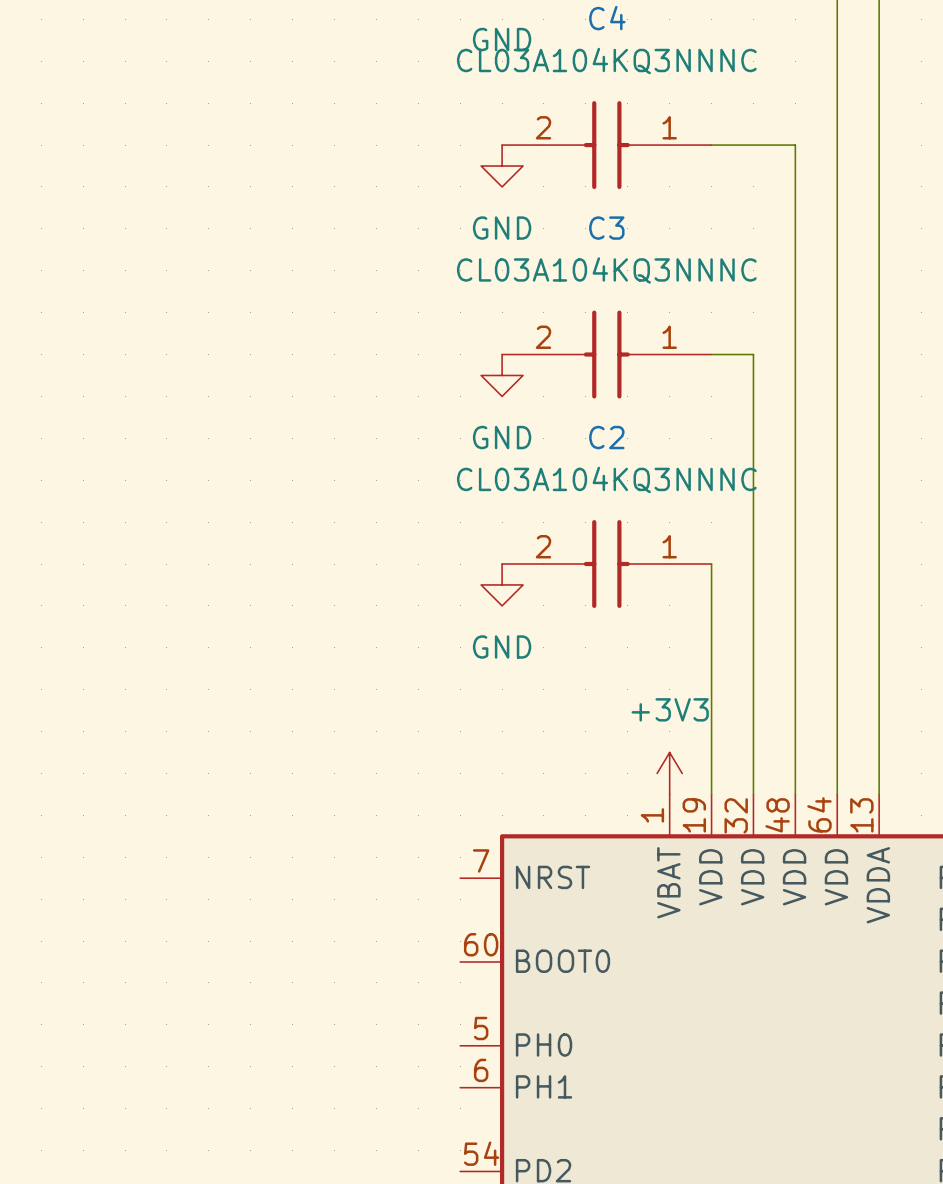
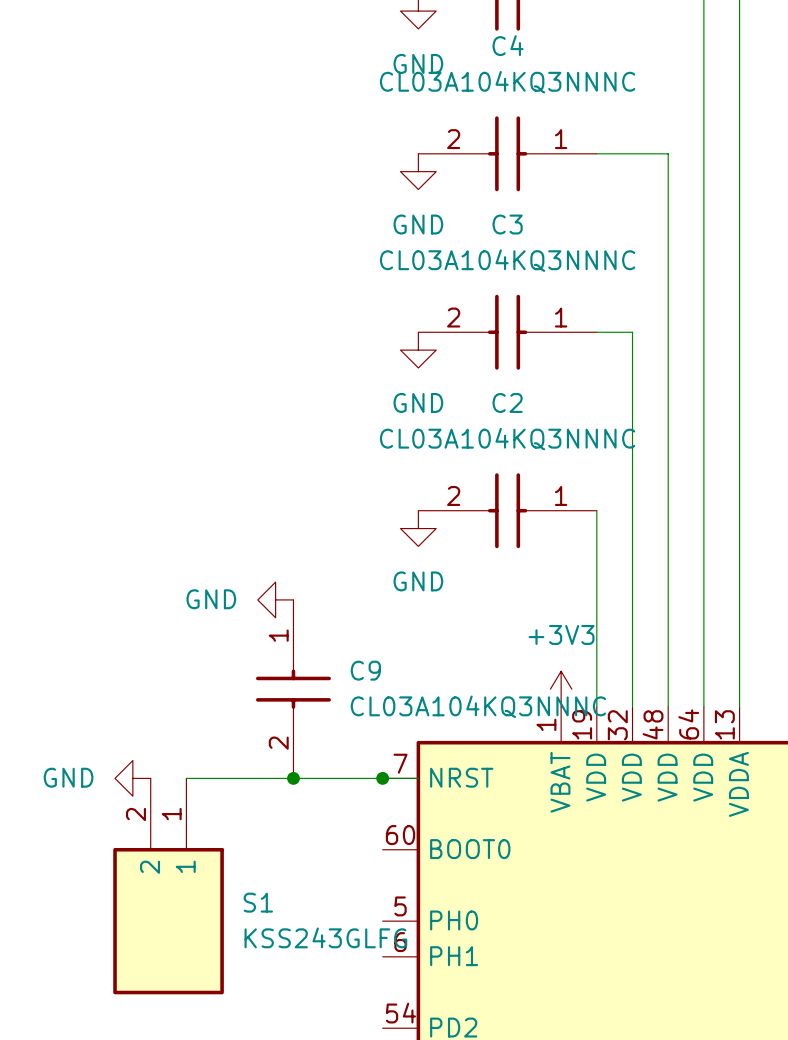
power symbol: none -> GND (275, 599)
C9: none -> CL03A104KQ3NNNC (293, 689)
power symbol: none -> GND (132, 778)
wire: none -> (186, 778) (418, 778)
junction: none -> (293, 778)
junction: none -> (382, 778)
S1: none -> KSS243GLFG (168, 886)

